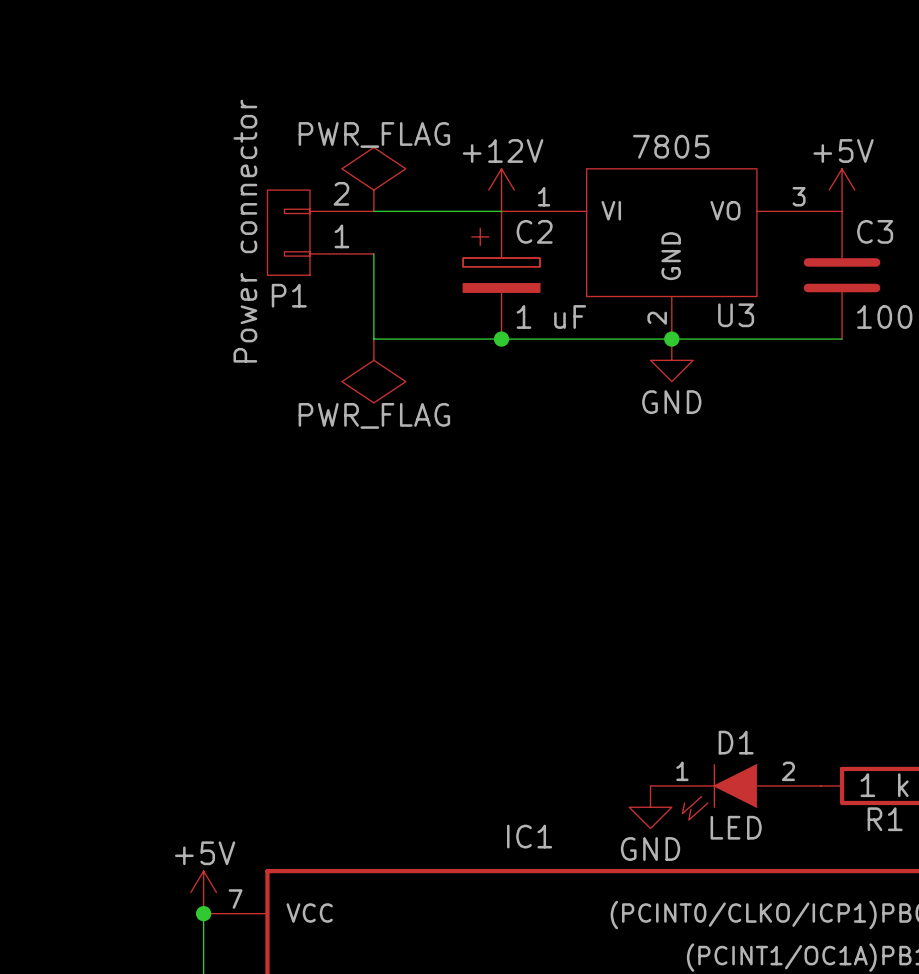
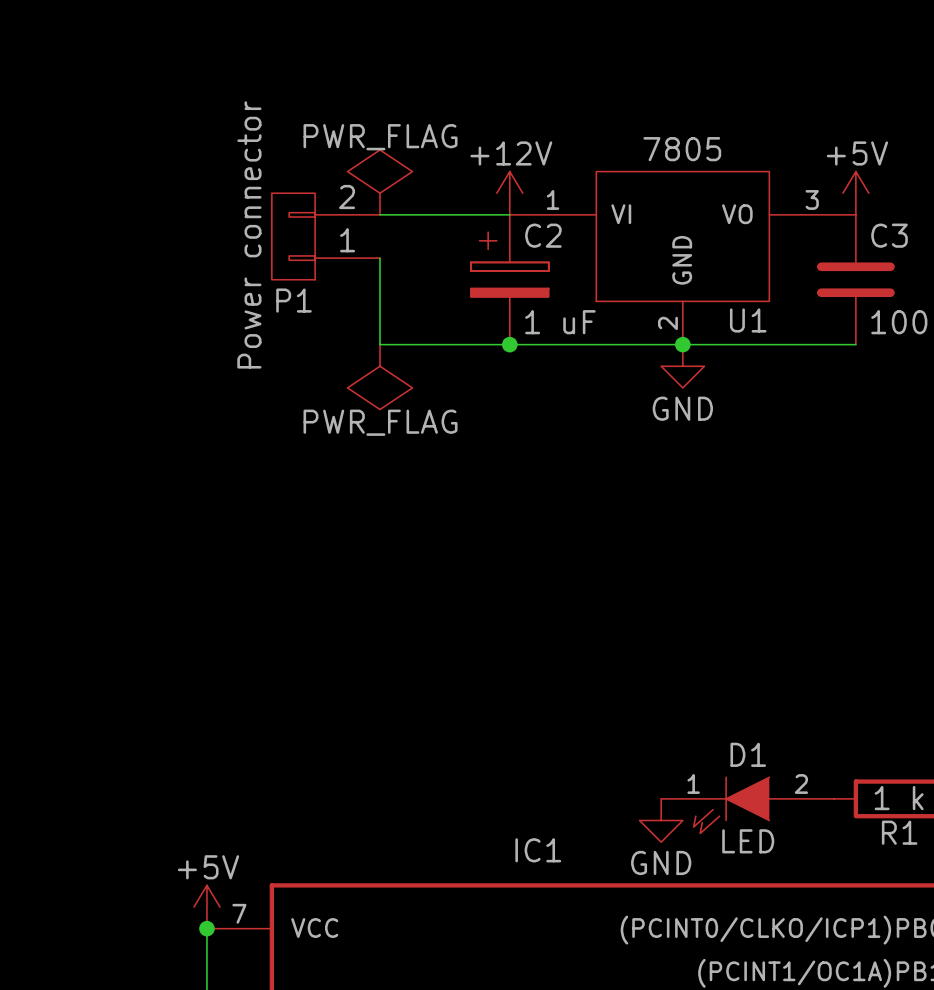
U3 name: U3 (736, 315) -> U1 (748, 320)

